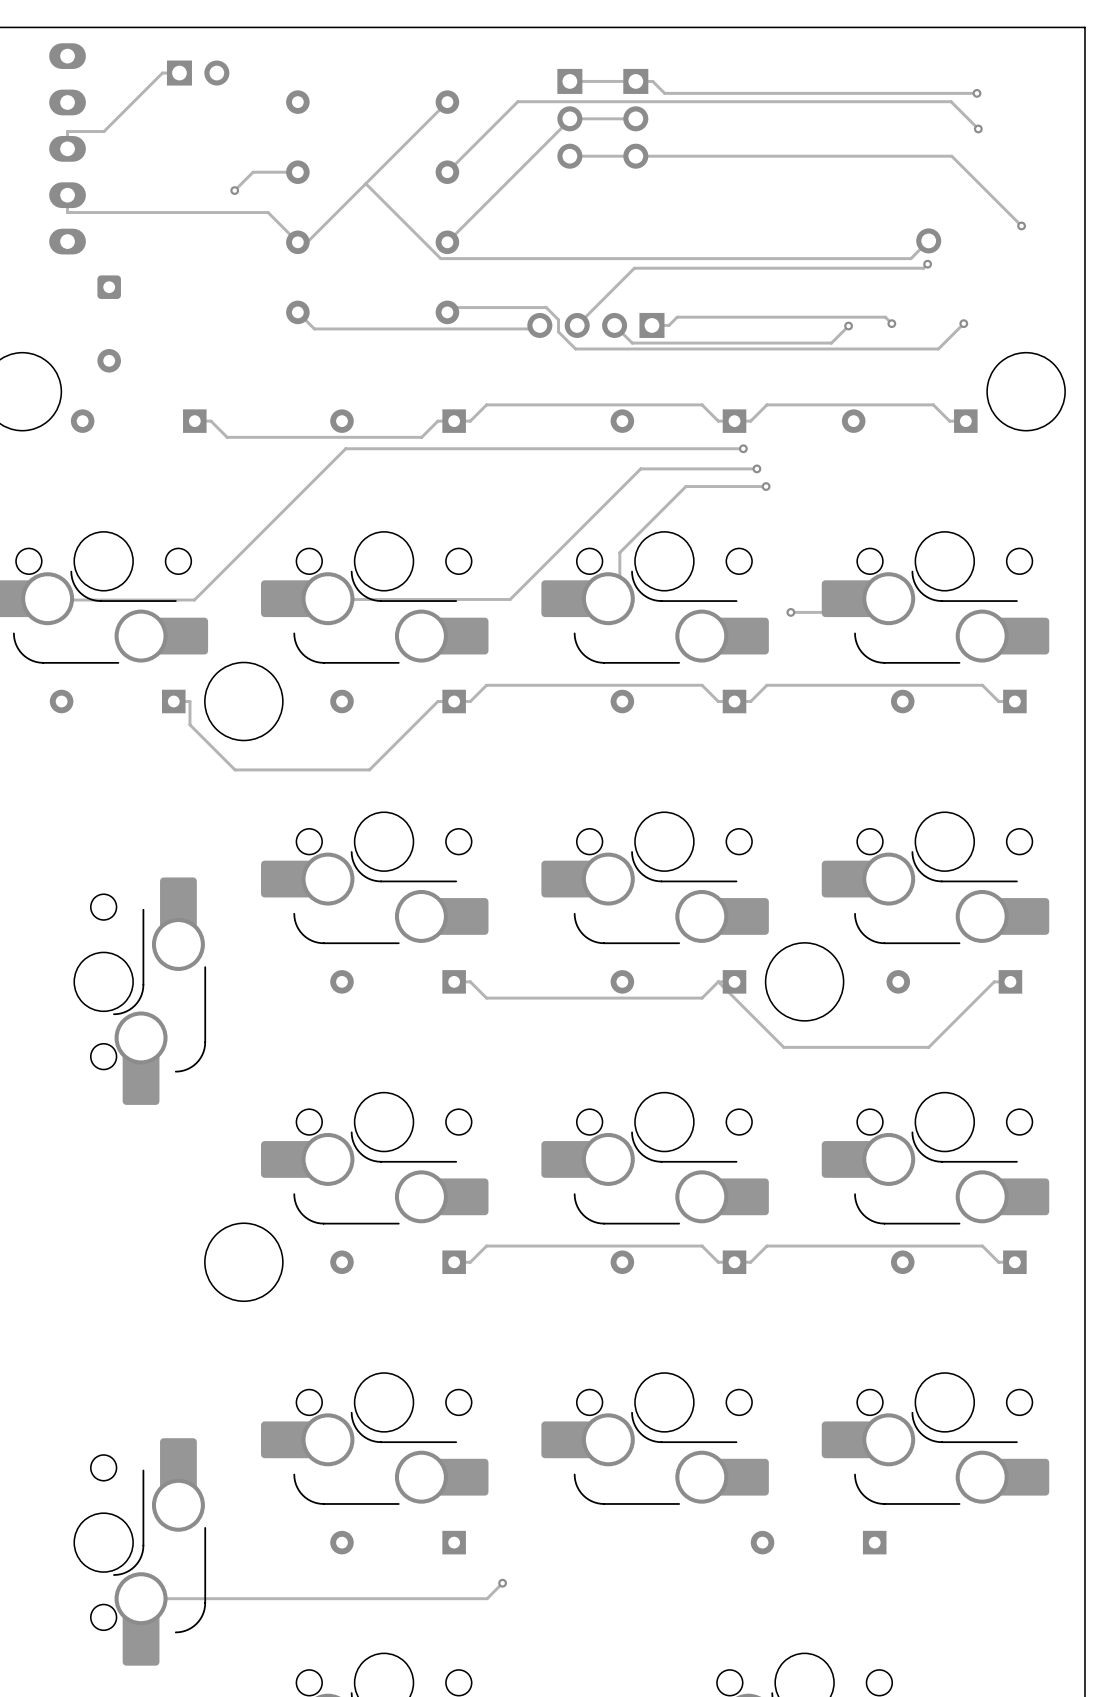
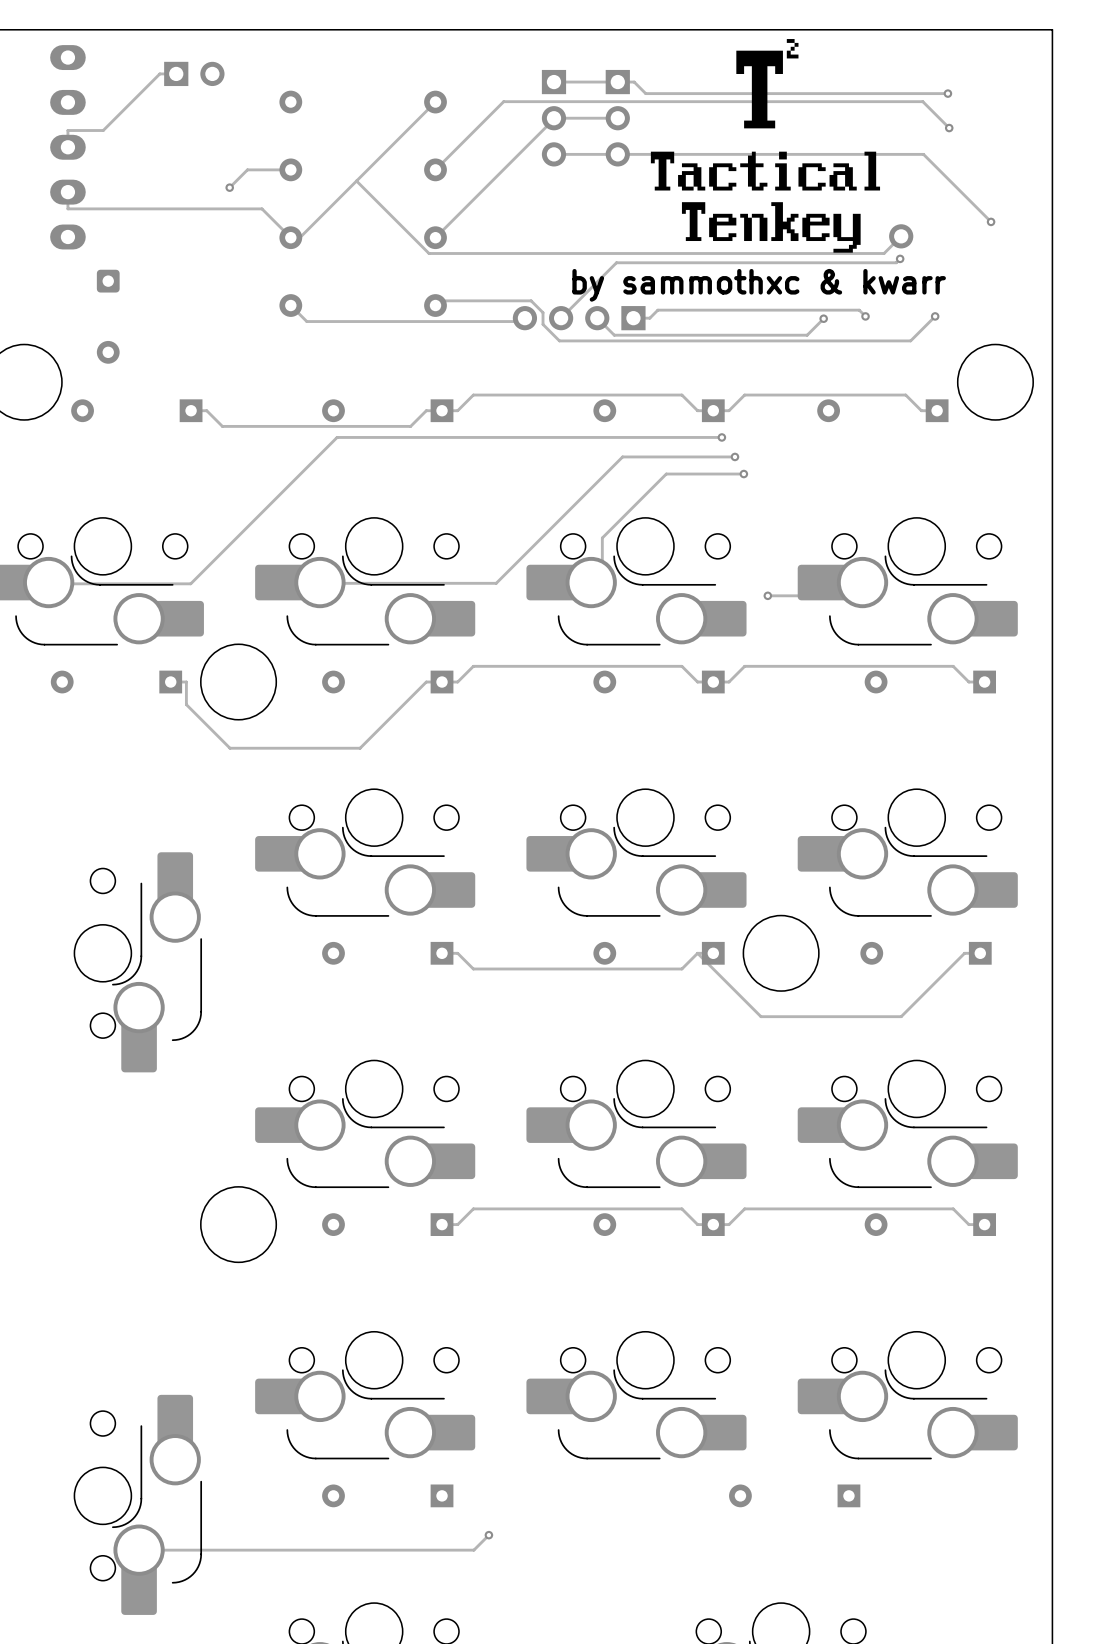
drawing: none -> [650, 39, 881, 253]

